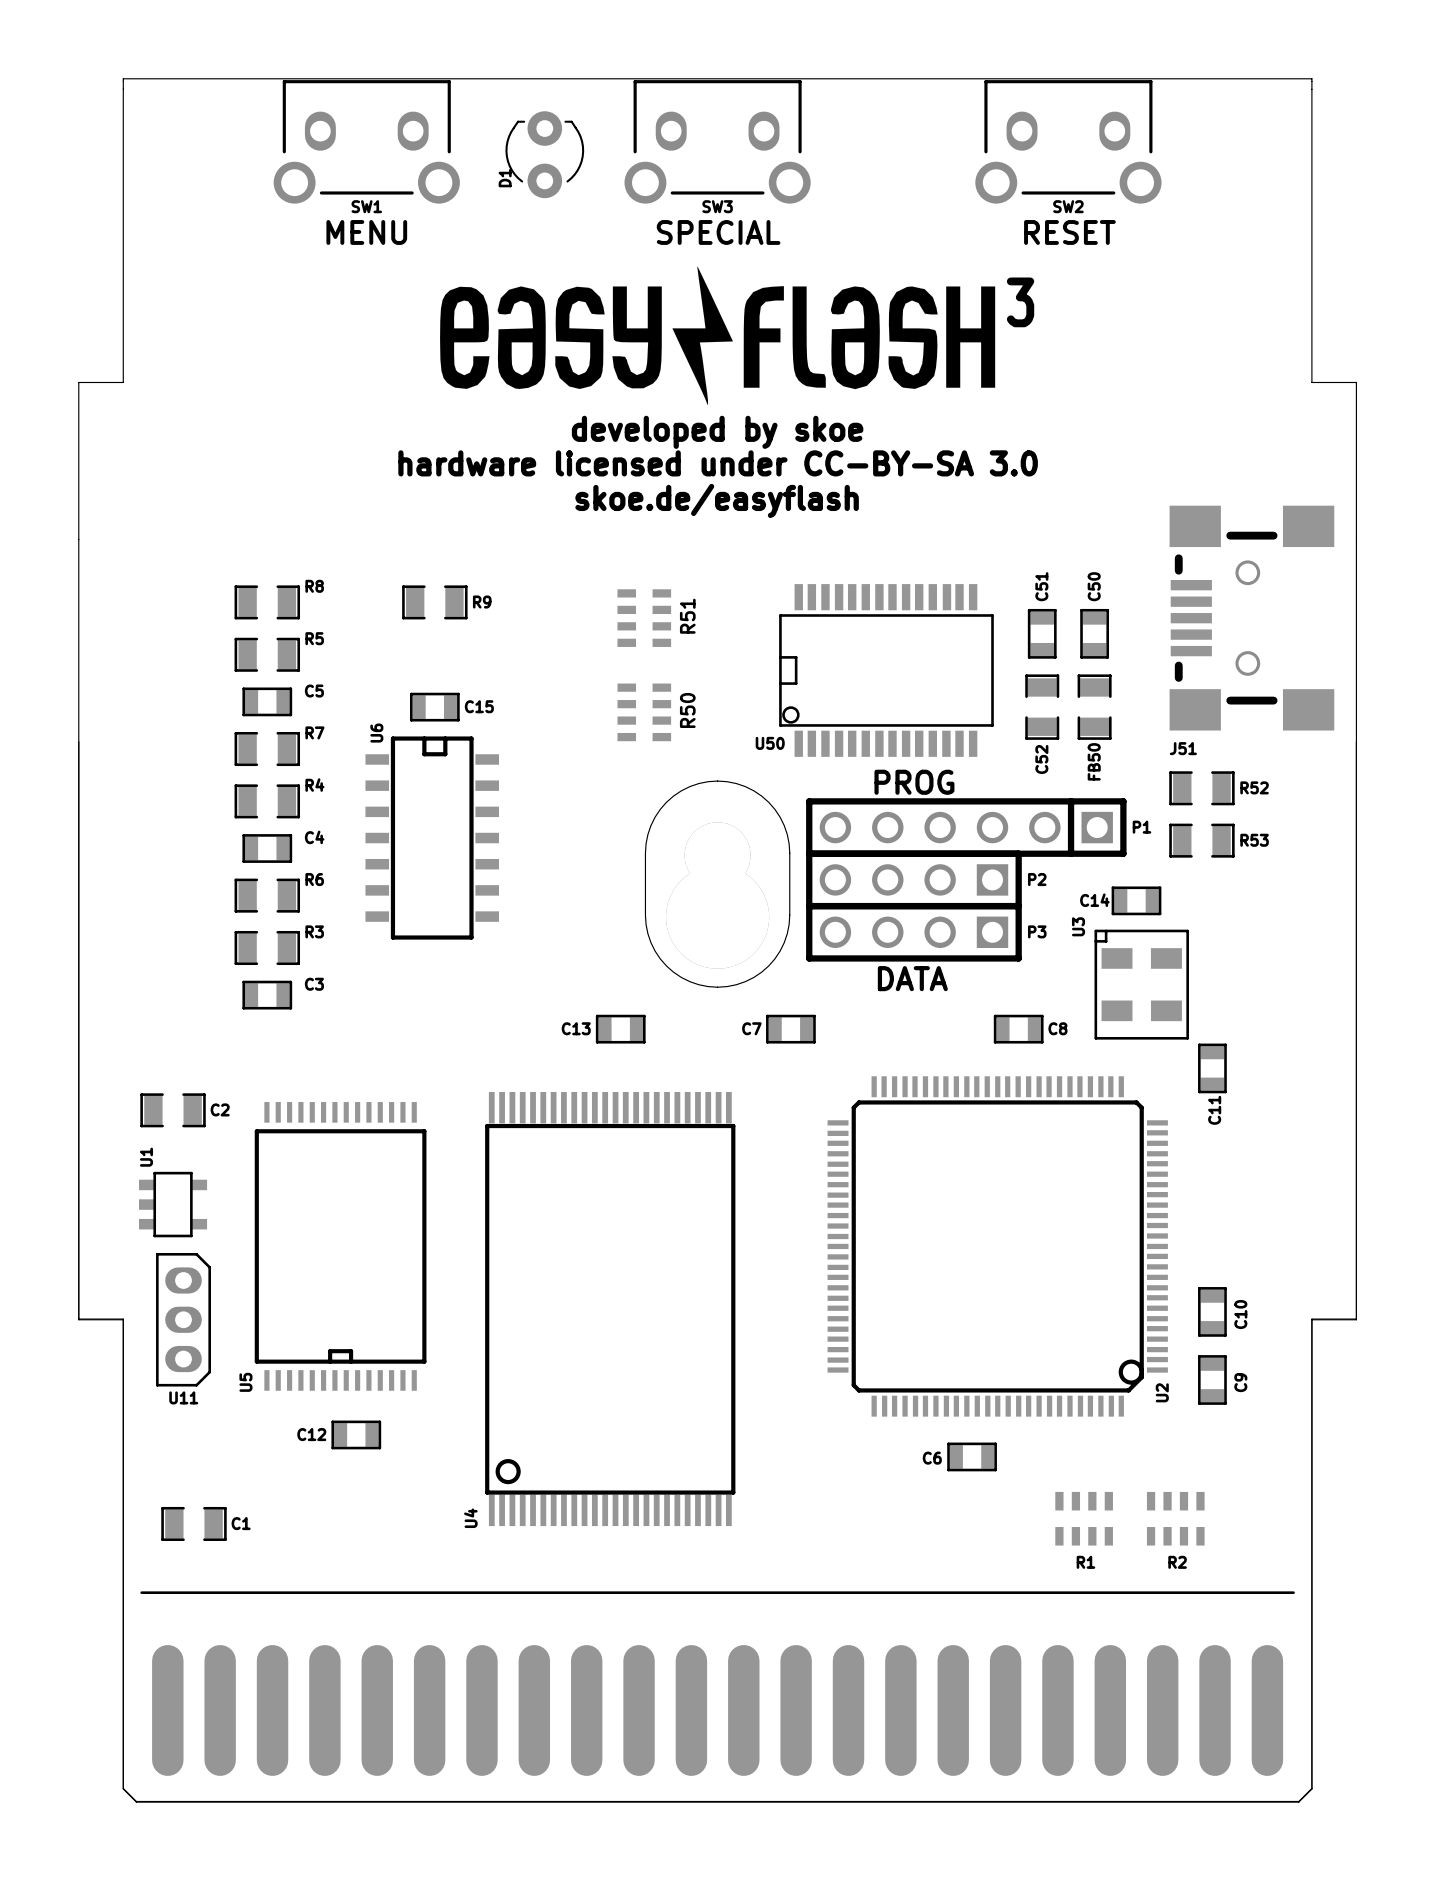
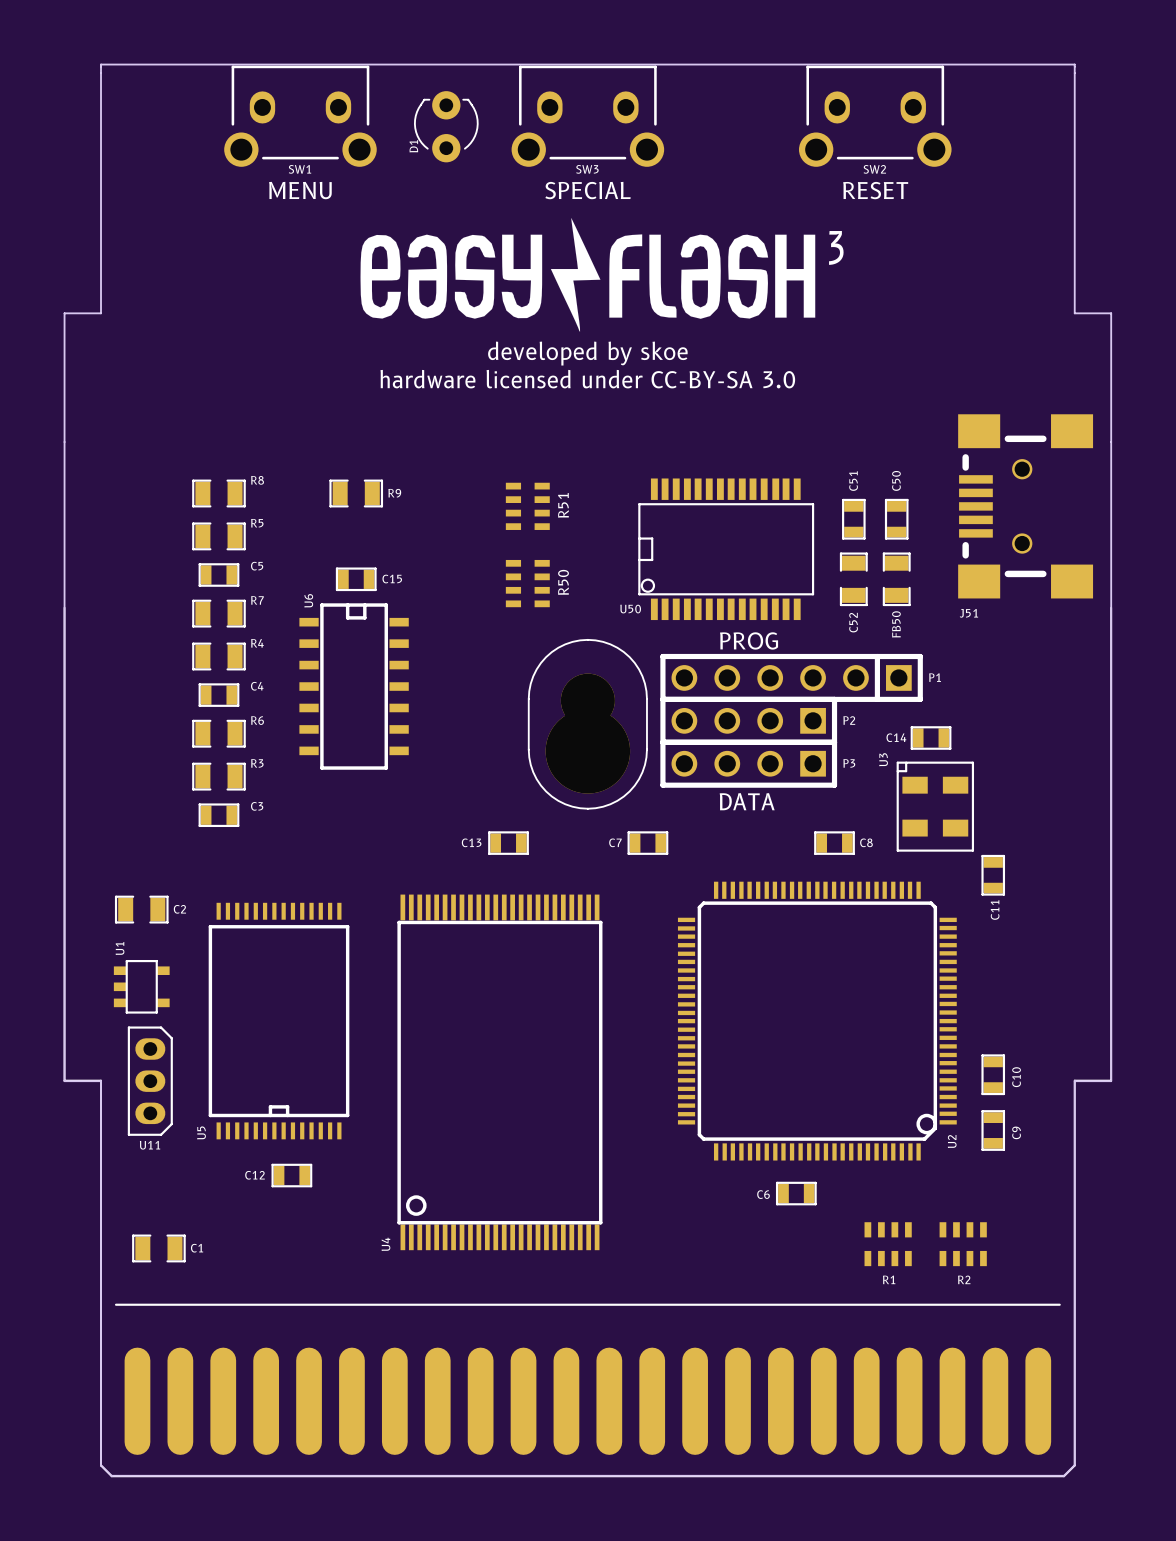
text: skoe.de/easyflash (717, 500) -> none
R52: (1201, 788) -> none
R53: (1201, 840) -> none

